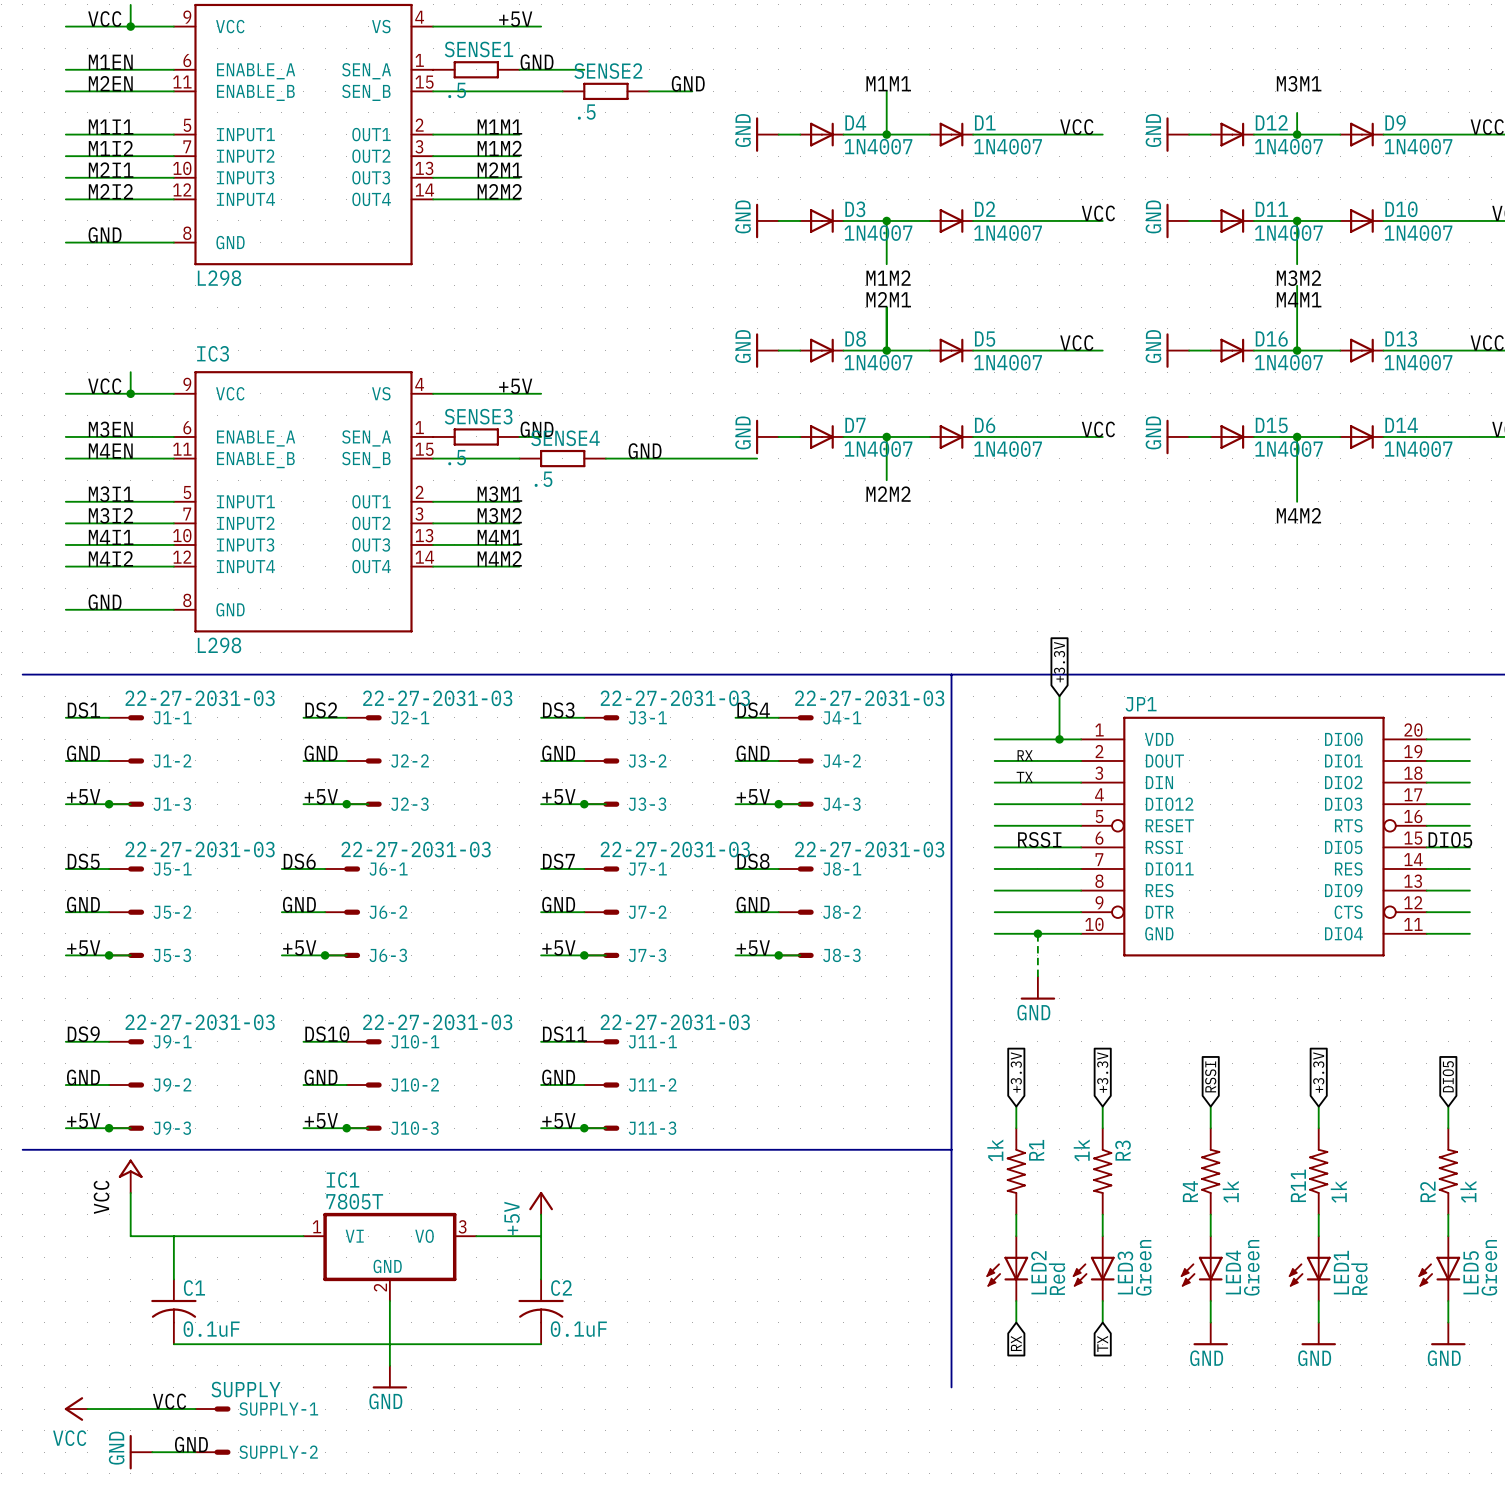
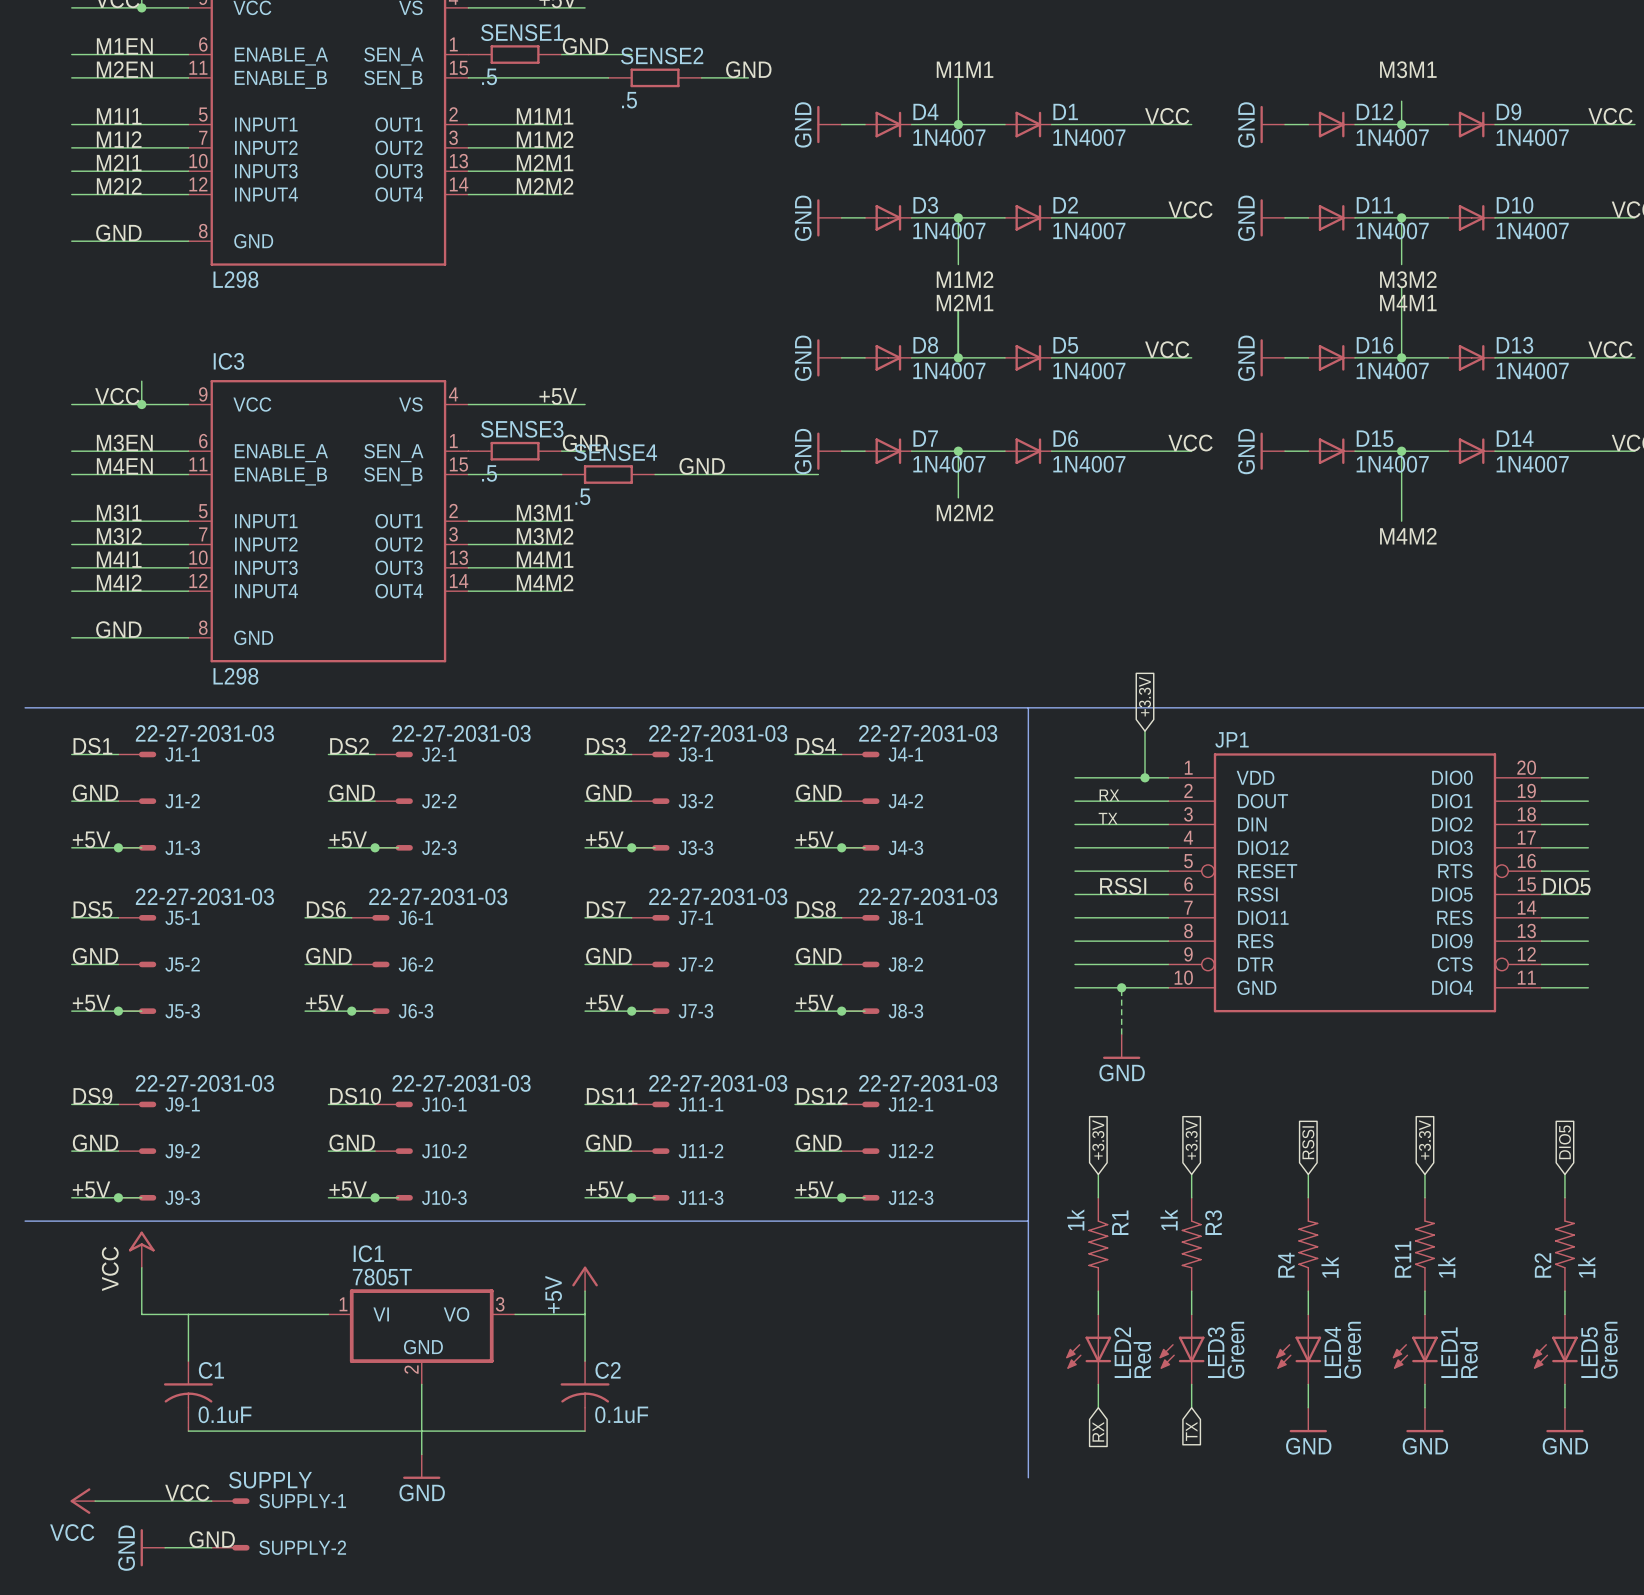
label: none -> DS12 (822, 1096)
wire: none -> (795, 1104) (841, 1104)
J12-1: none -> 22-27-2031-03 (860, 1104)
label: none -> GND (818, 1142)
wire: none -> (795, 1151) (841, 1151)
J12-2: none -> (860, 1151)
label: none -> +5V (814, 1189)
wire: none -> (795, 1197) (865, 1197)
junction: none -> (841, 1197)
J12-3: none -> (860, 1197)

